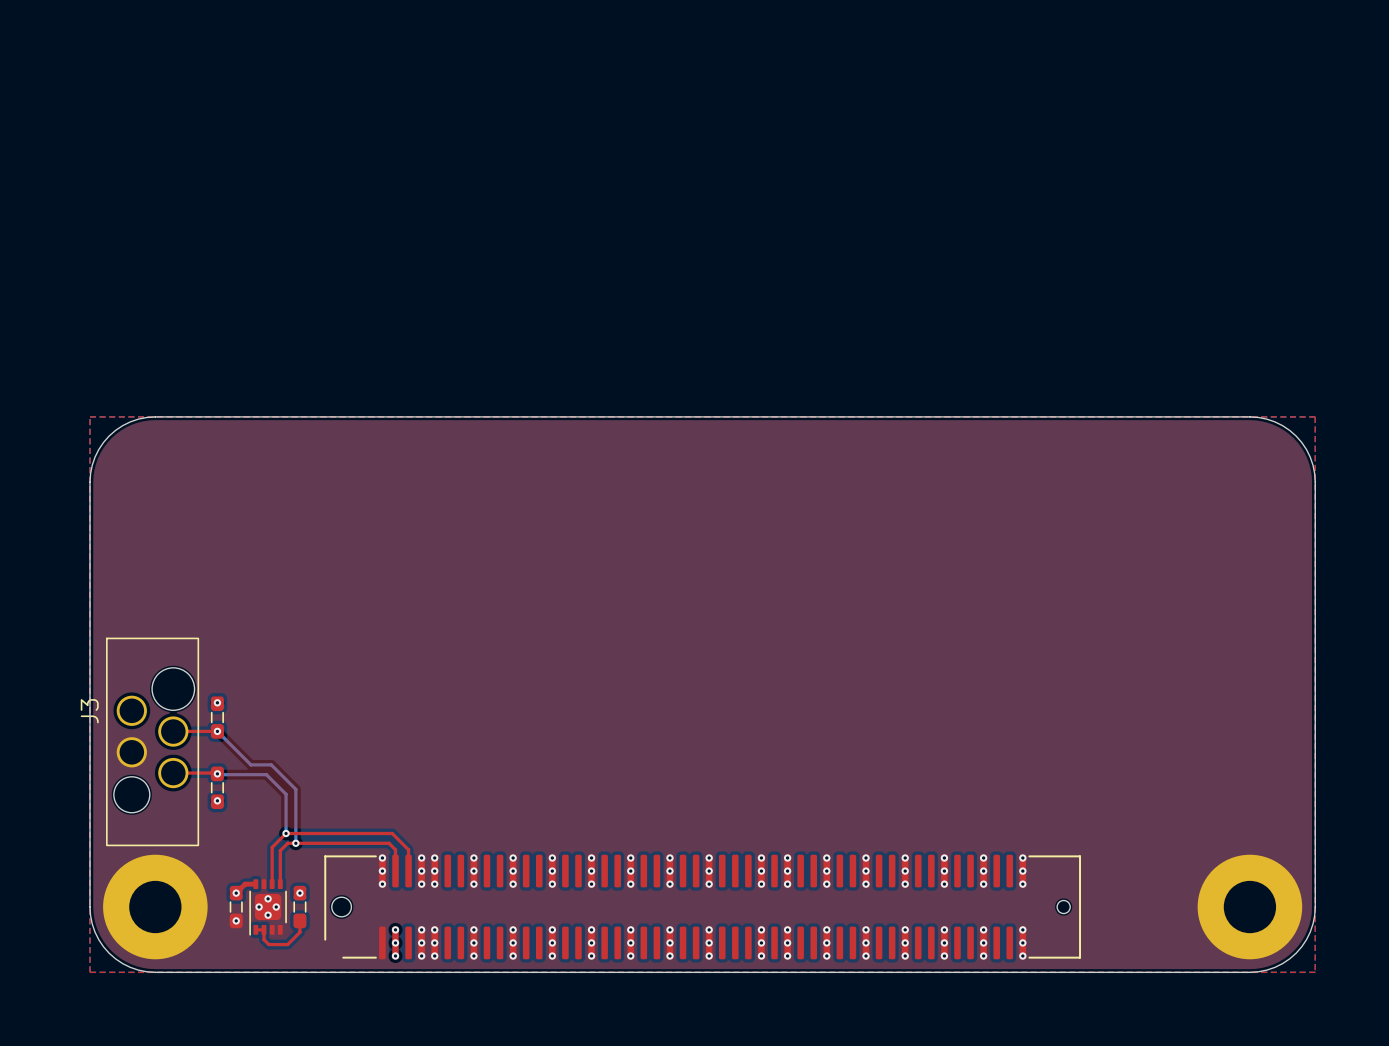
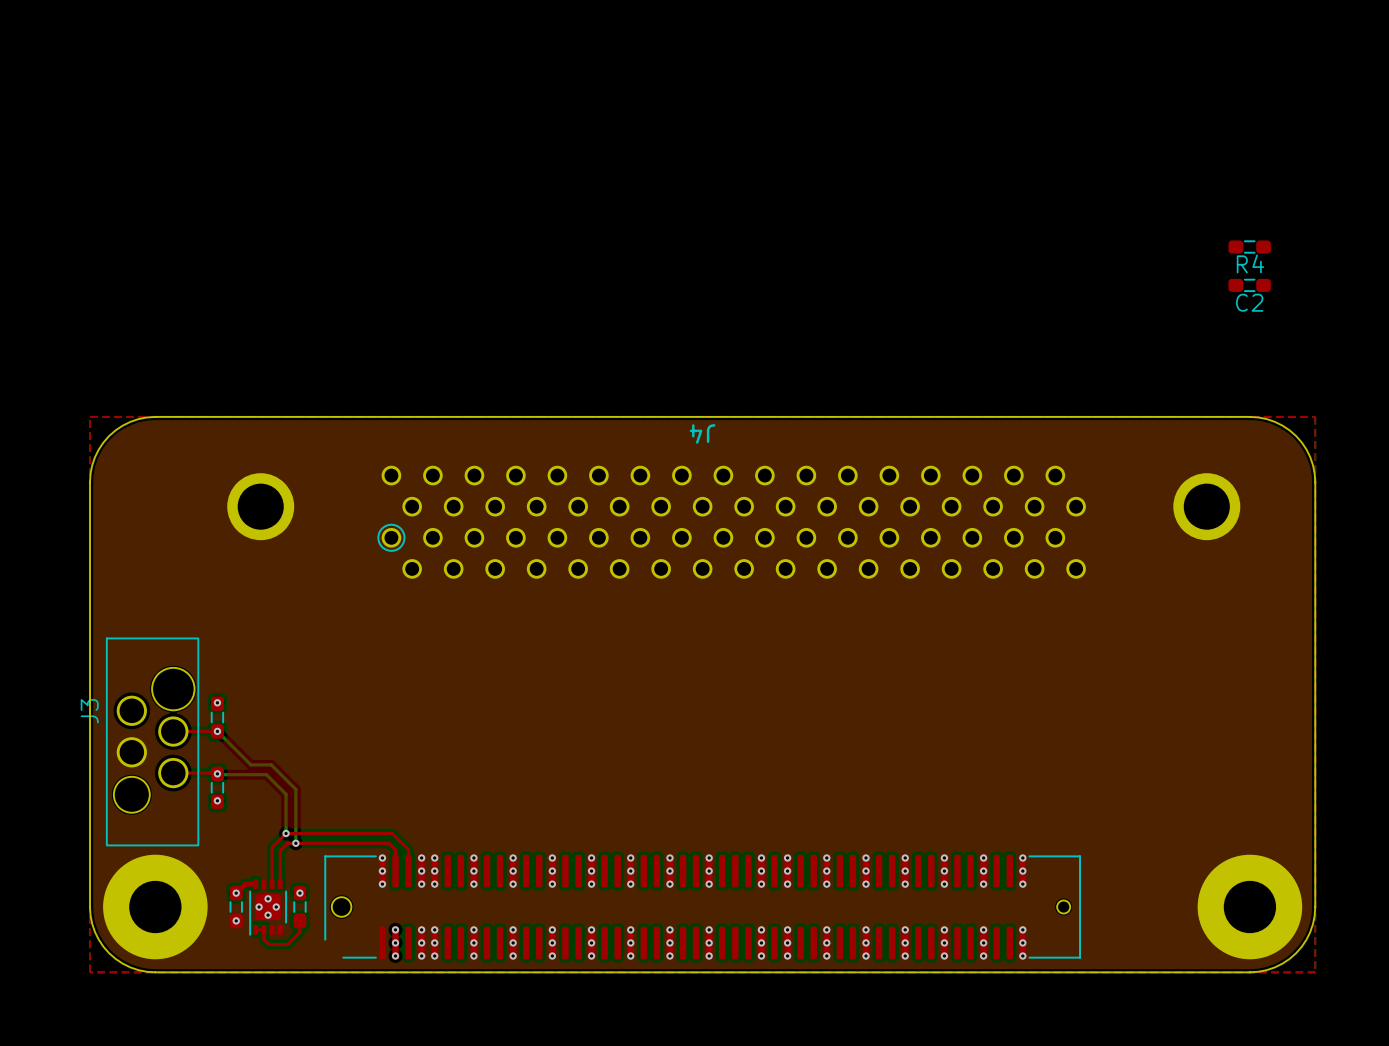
R4: none -> (1249, 246)
C2: none -> (1249, 285)
J4: none -> (733, 522)

